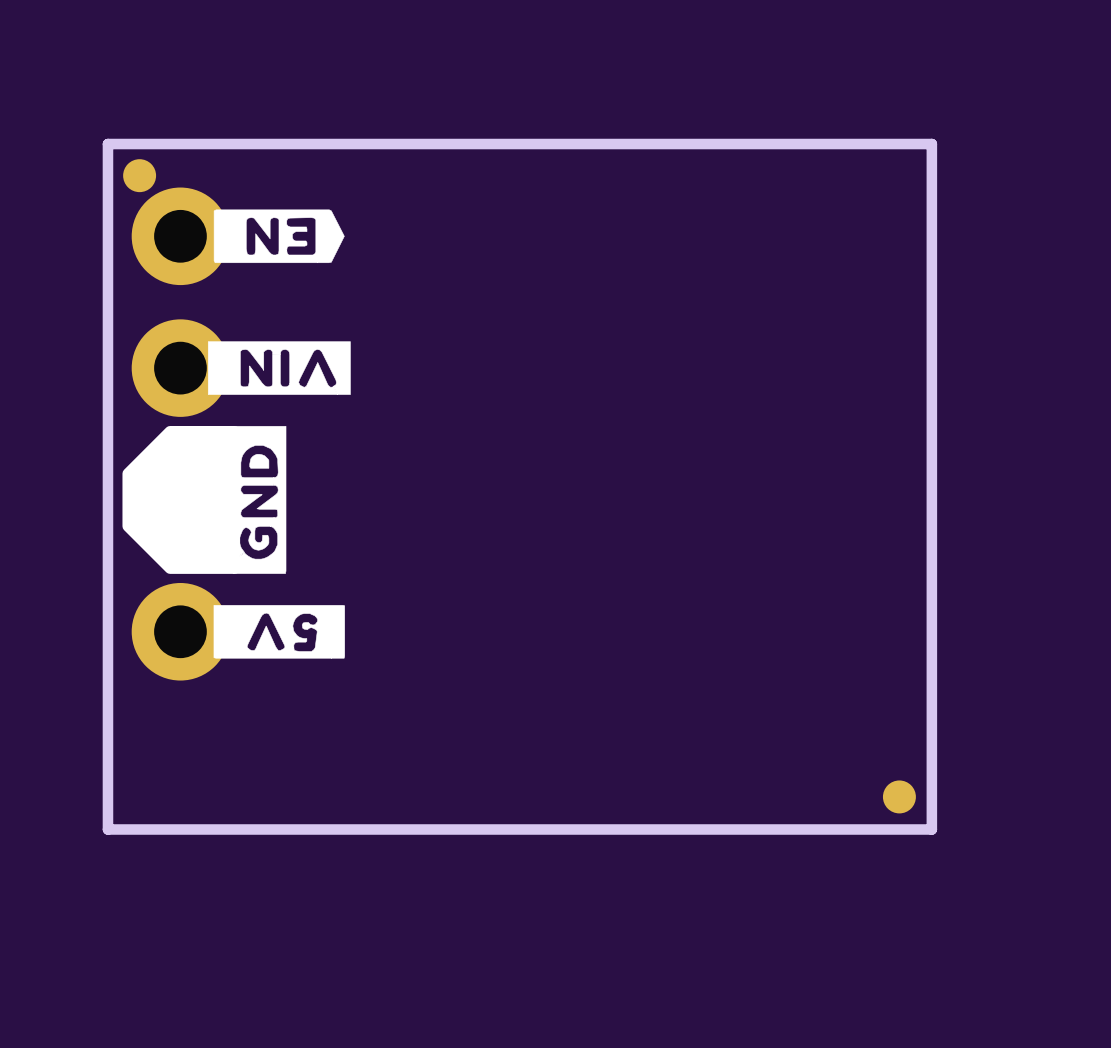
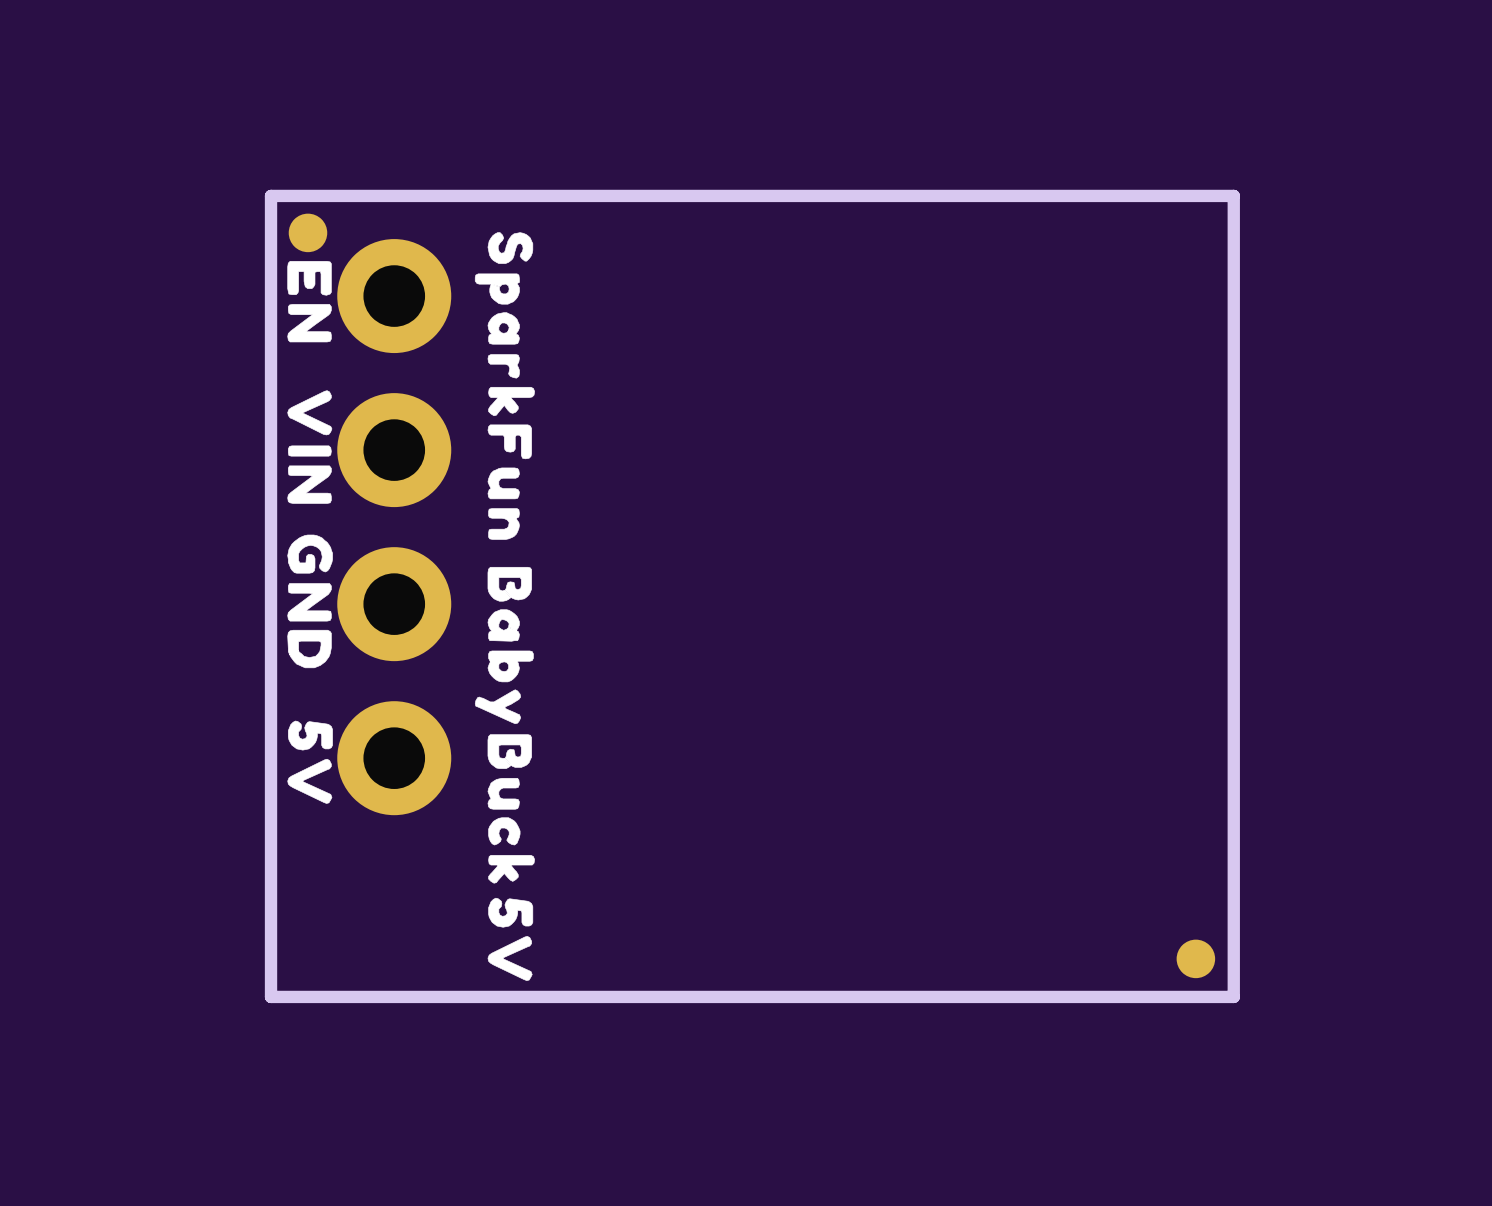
drawing: none -> [474, 232, 535, 540]
drawing: none -> [287, 261, 333, 504]
drawing: [213, 209, 345, 264] -> none
drawing: [207, 341, 351, 574] -> none
drawing shape: [122, 425, 240, 574] -> [287, 534, 333, 669]
part position: (180, 434) -> (394, 527)
drawing: none -> [287, 720, 333, 804]
drawing shape: [213, 605, 345, 659] -> [474, 566, 535, 884]
drawing: none -> [487, 897, 534, 981]

